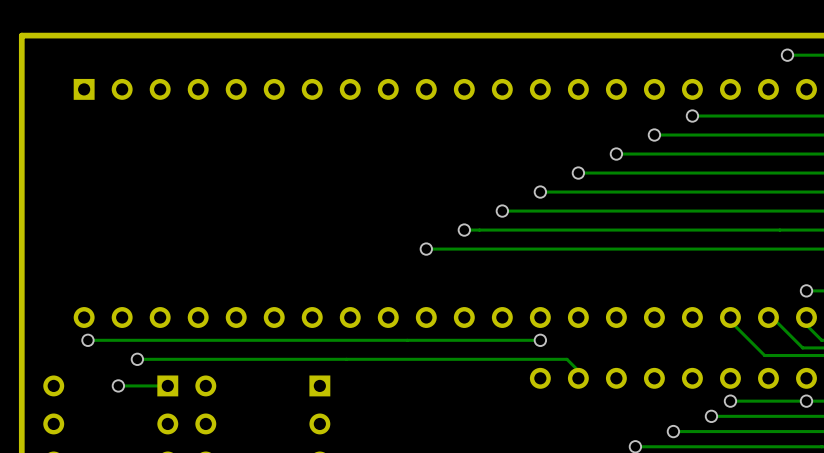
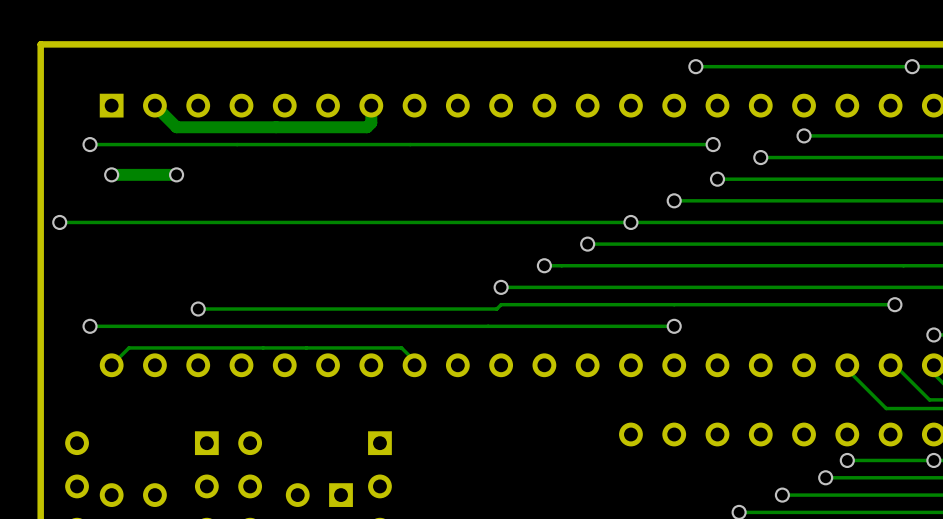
via: none -> (695, 66)
track: none -> (912, 66) (695, 66)
track: none -> (371, 105) (371, 122) (366, 127) (176, 127) (154, 105)
via: none -> (90, 144)
track: none -> (713, 144) (90, 144)
via: none -> (713, 144)
via: none -> (111, 174)
track: none -> (176, 174) (111, 174)
via: none -> (176, 174)
via: none -> (59, 222)
track: none -> (630, 222) (59, 222)
track: none -> (894, 304) (501, 304) (496, 309) (198, 309)
via: none -> (894, 304)
via: none -> (198, 309)
via: none -> (90, 326)
track: none -> (674, 326) (90, 326)
track: none -> (414, 365) (414, 360) (401, 347) (128, 347) (111, 365)
via: (87, 340) -> none
track: (540, 340) (87, 340) -> none
via position: (540, 340) -> (674, 326)
track: (137, 359) (566, 359) (578, 370) (578, 378) -> none
via: (137, 359) -> none
via: (118, 385) -> none
track: (167, 385) (118, 385) -> none
part: none -> (133, 495)
part: none -> (319, 495)

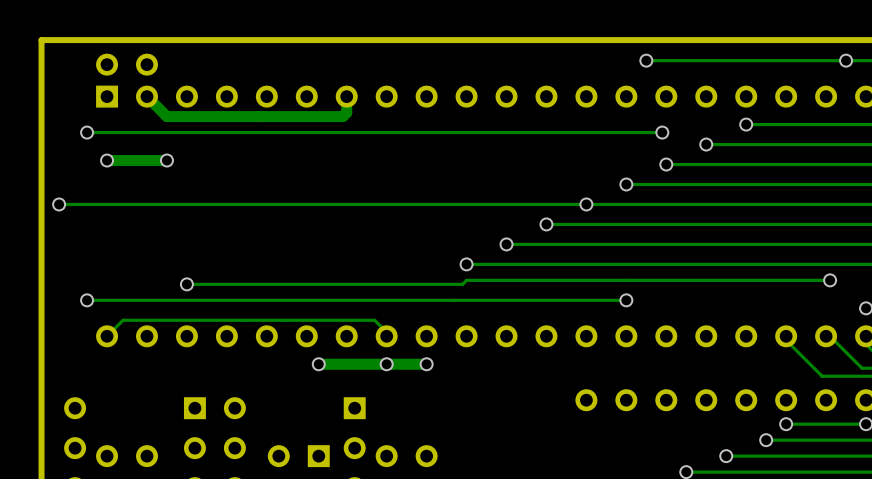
part: none -> (127, 64)
via: none -> (318, 364)
via: none -> (386, 364)
track: none -> (426, 364) (318, 364)
via: none -> (426, 364)
part: none -> (406, 456)

